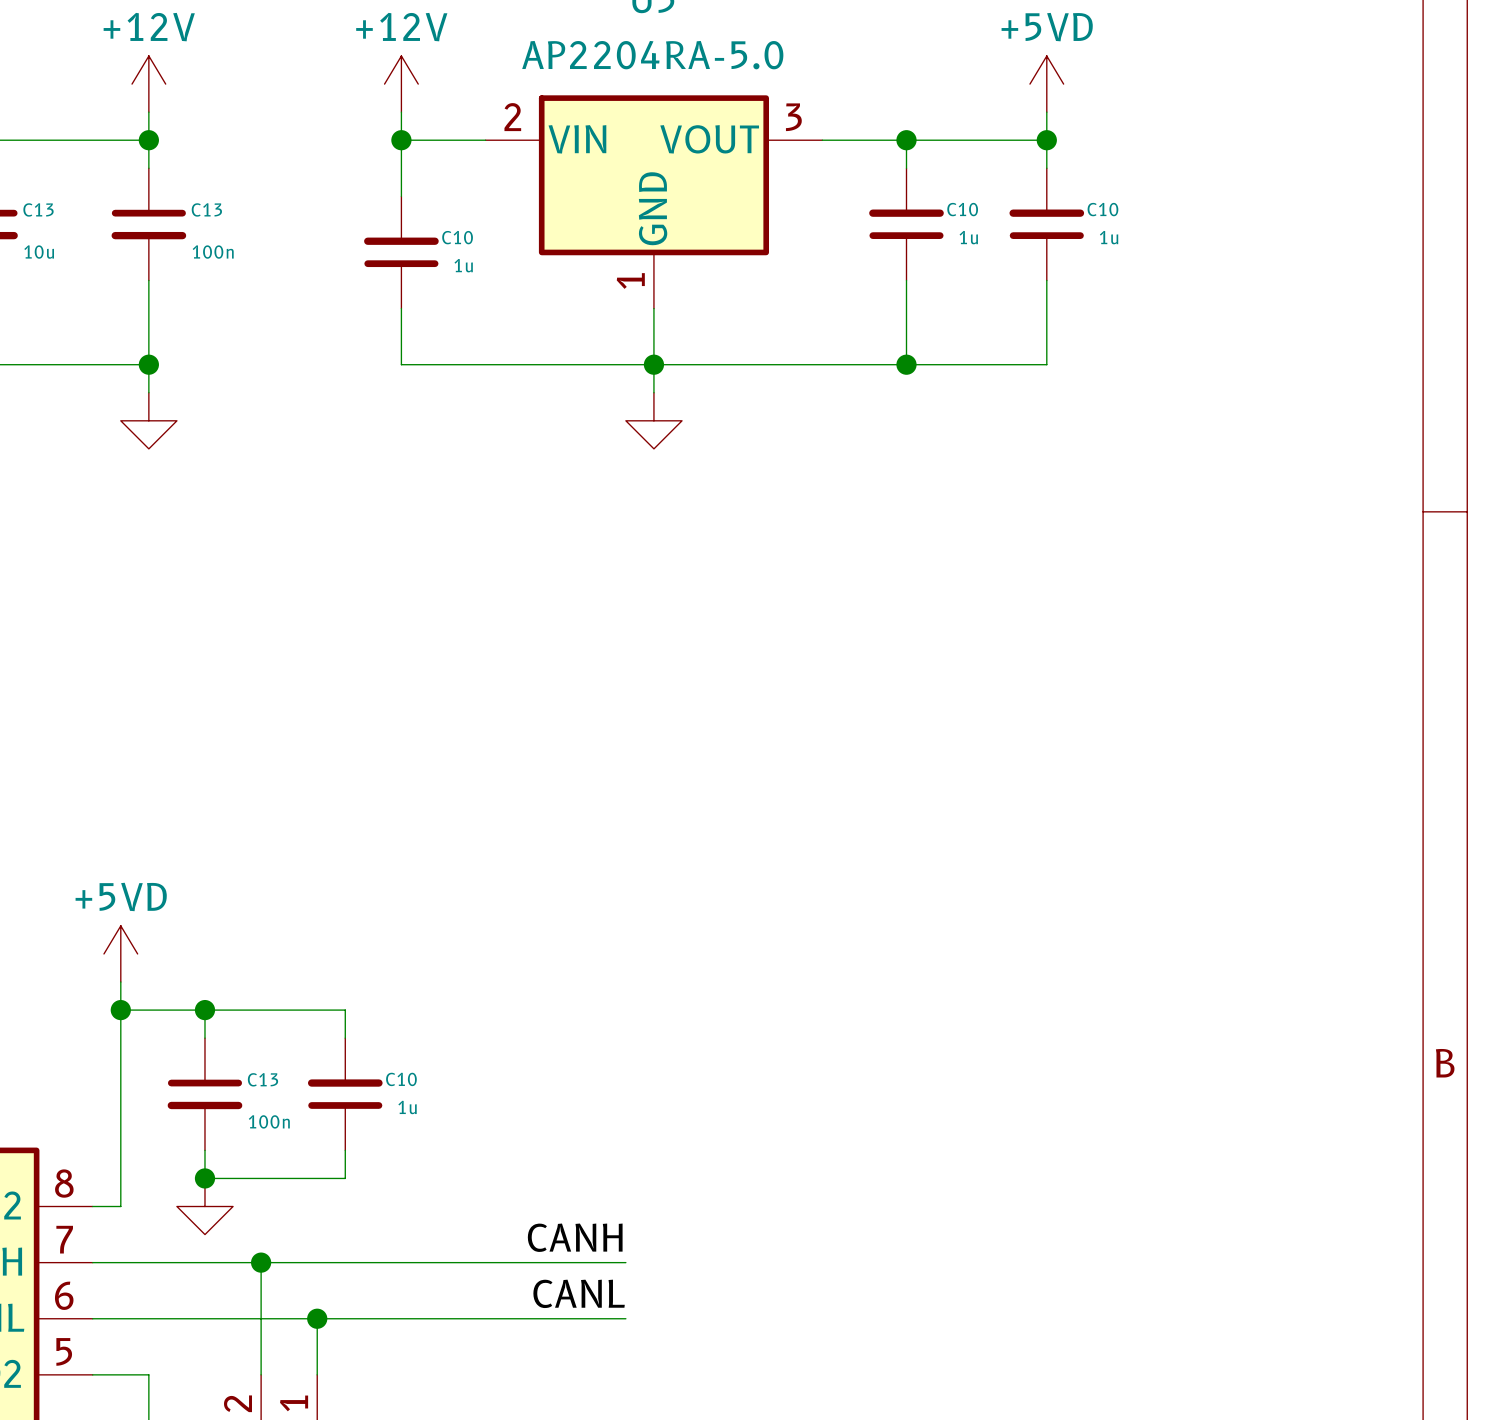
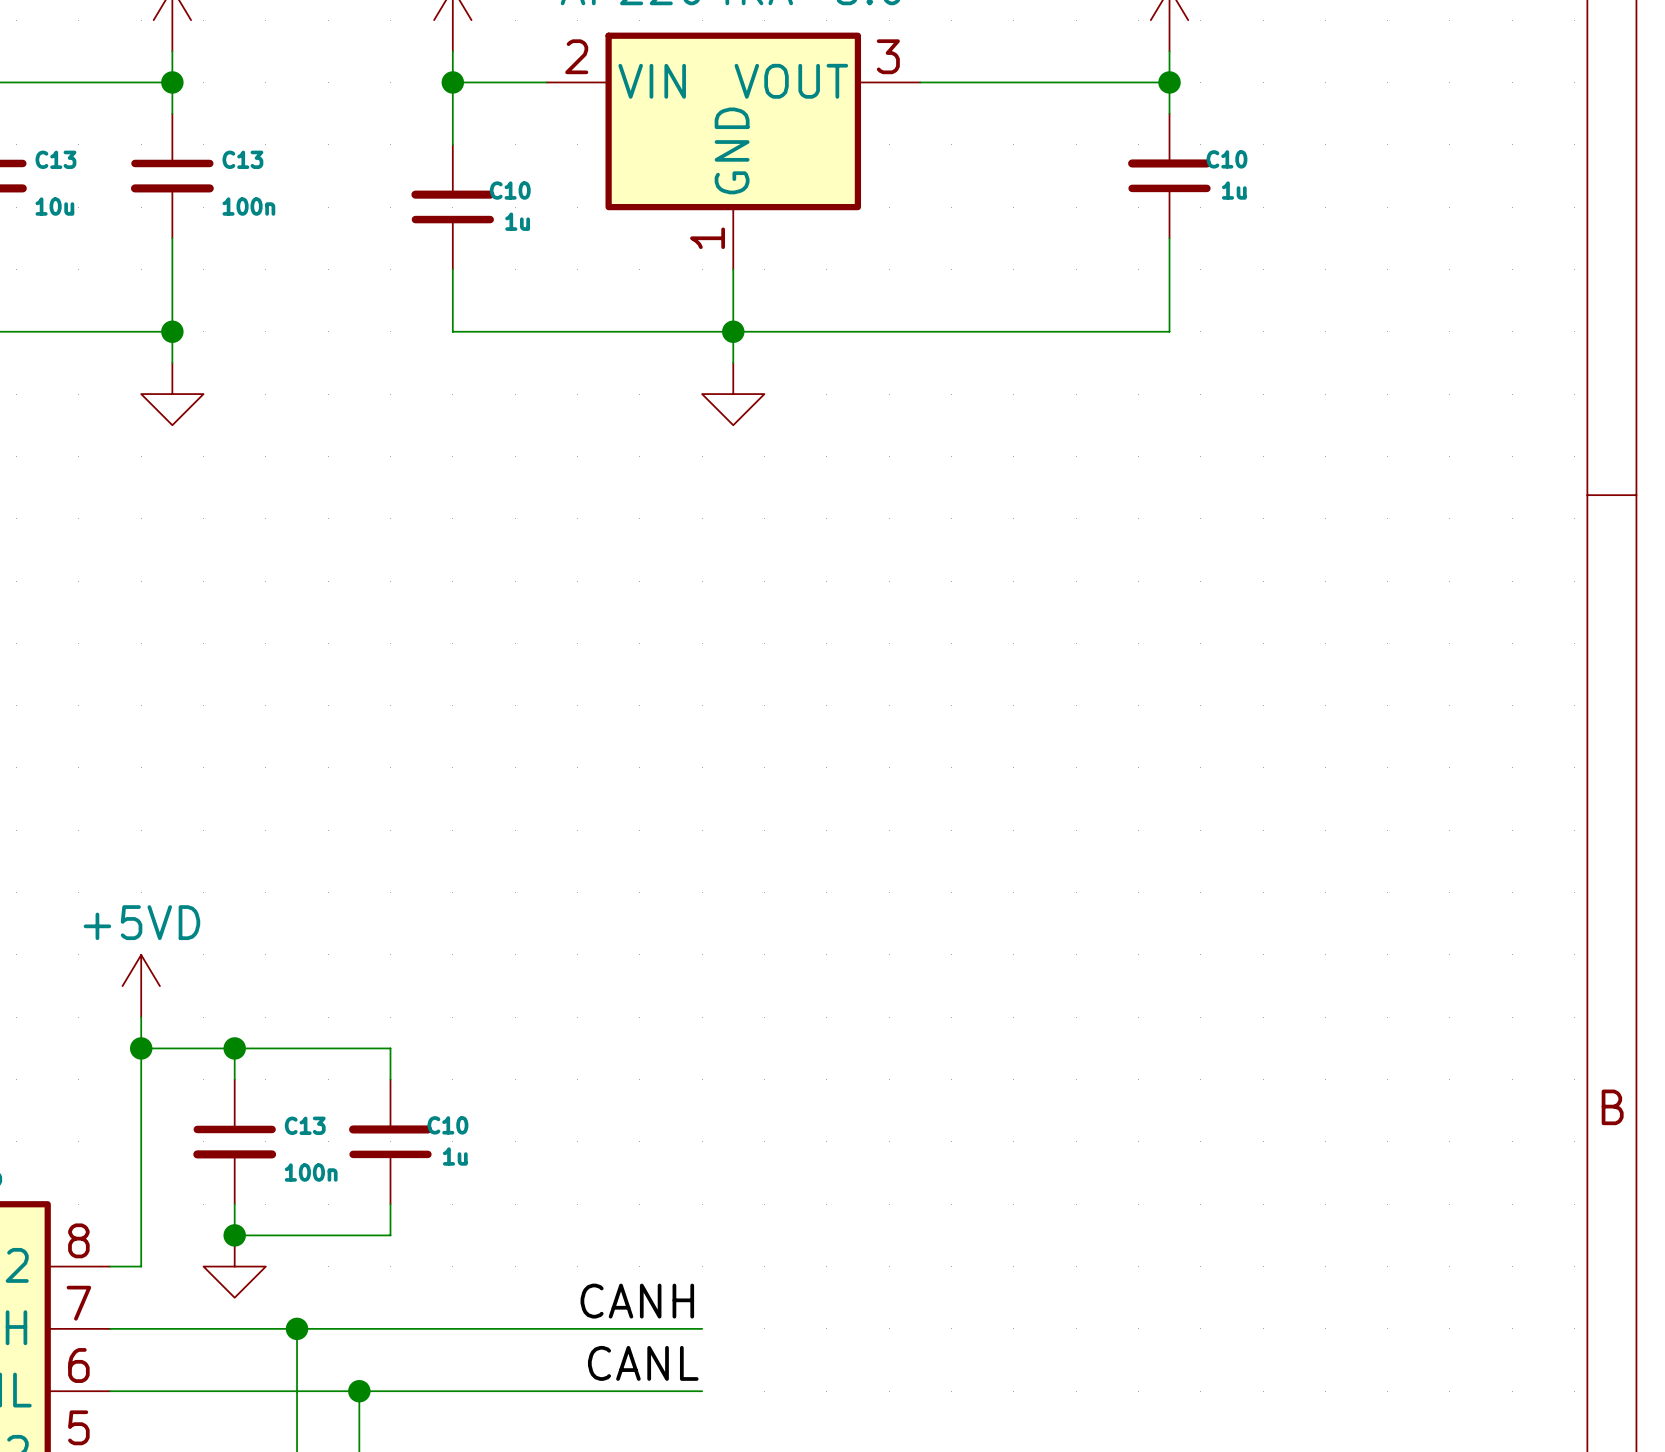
wire: (906, 140) (906, 168) -> none
junction: (906, 140) -> none
C10: 1u (906, 224) -> none
wire: (906, 280) (906, 364) -> none
junction: (906, 364) -> none

